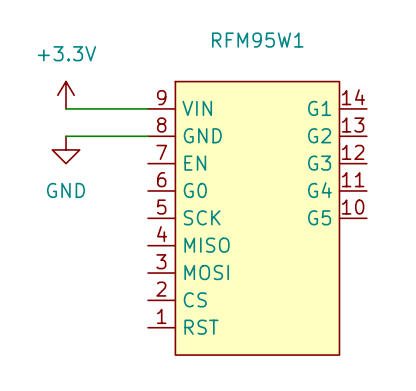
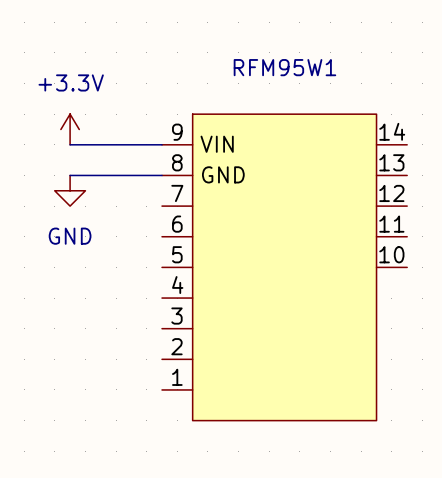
RFM95W1 symbol: [148, 81, 367, 356] -> [162, 114, 408, 421]

